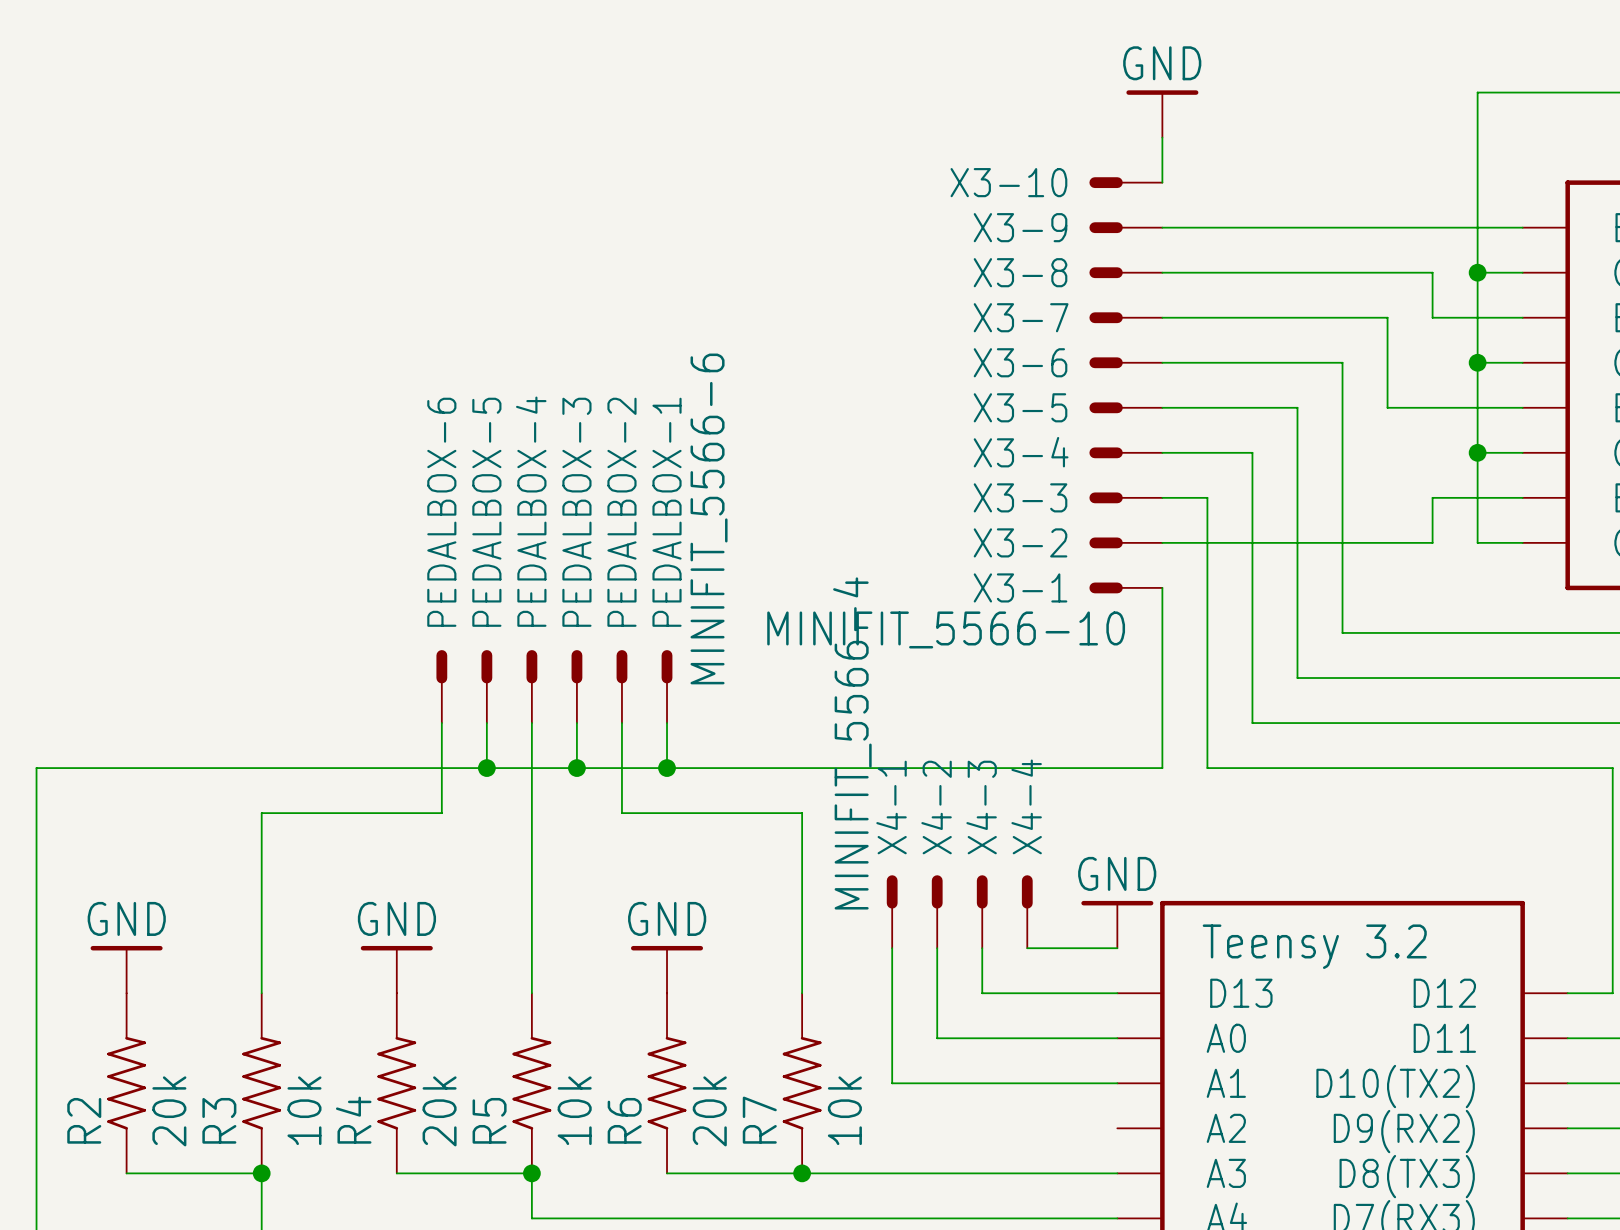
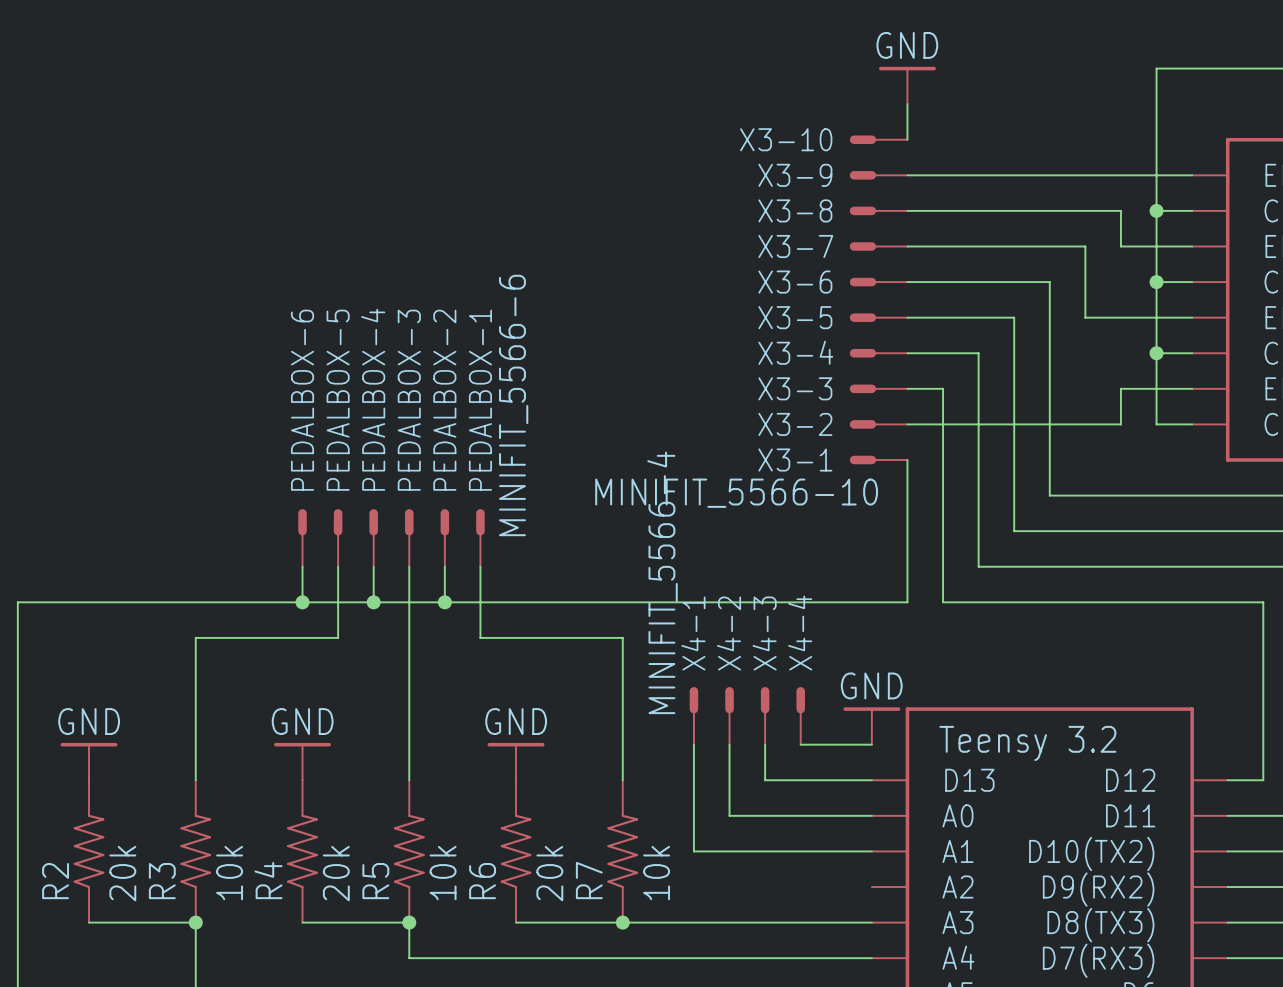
PEDALBOX-4 name: PEDALBOX-4 (531, 511) -> PEDALBOX-3 (409, 400)
PEDALBOX-6 name: PEDALBOX-6 (441, 512) -> PEDALBOX-5 (338, 400)
PEDALBOX-5 name: PEDALBOX-5 (486, 512) -> PEDALBOX-4 (373, 399)
PEDALBOX-3 name: PEDALBOX-3 (576, 512) -> PEDALBOX-2 (444, 400)
PEDALBOX-2 name: PEDALBOX-2 (621, 512) -> PEDALBOX-1 (480, 400)
PEDALBOX-2 value: none -> MINIFIT_5566-6 (513, 405)
PEDALBOX-6: none -> (302, 537)
PEDALBOX-1: MINIFIT_5566-6 (667, 686) -> none
wire: (667, 723) (667, 768) -> (302, 566) (302, 602)
junction: none -> (302, 602)
junction: (667, 768) -> none

